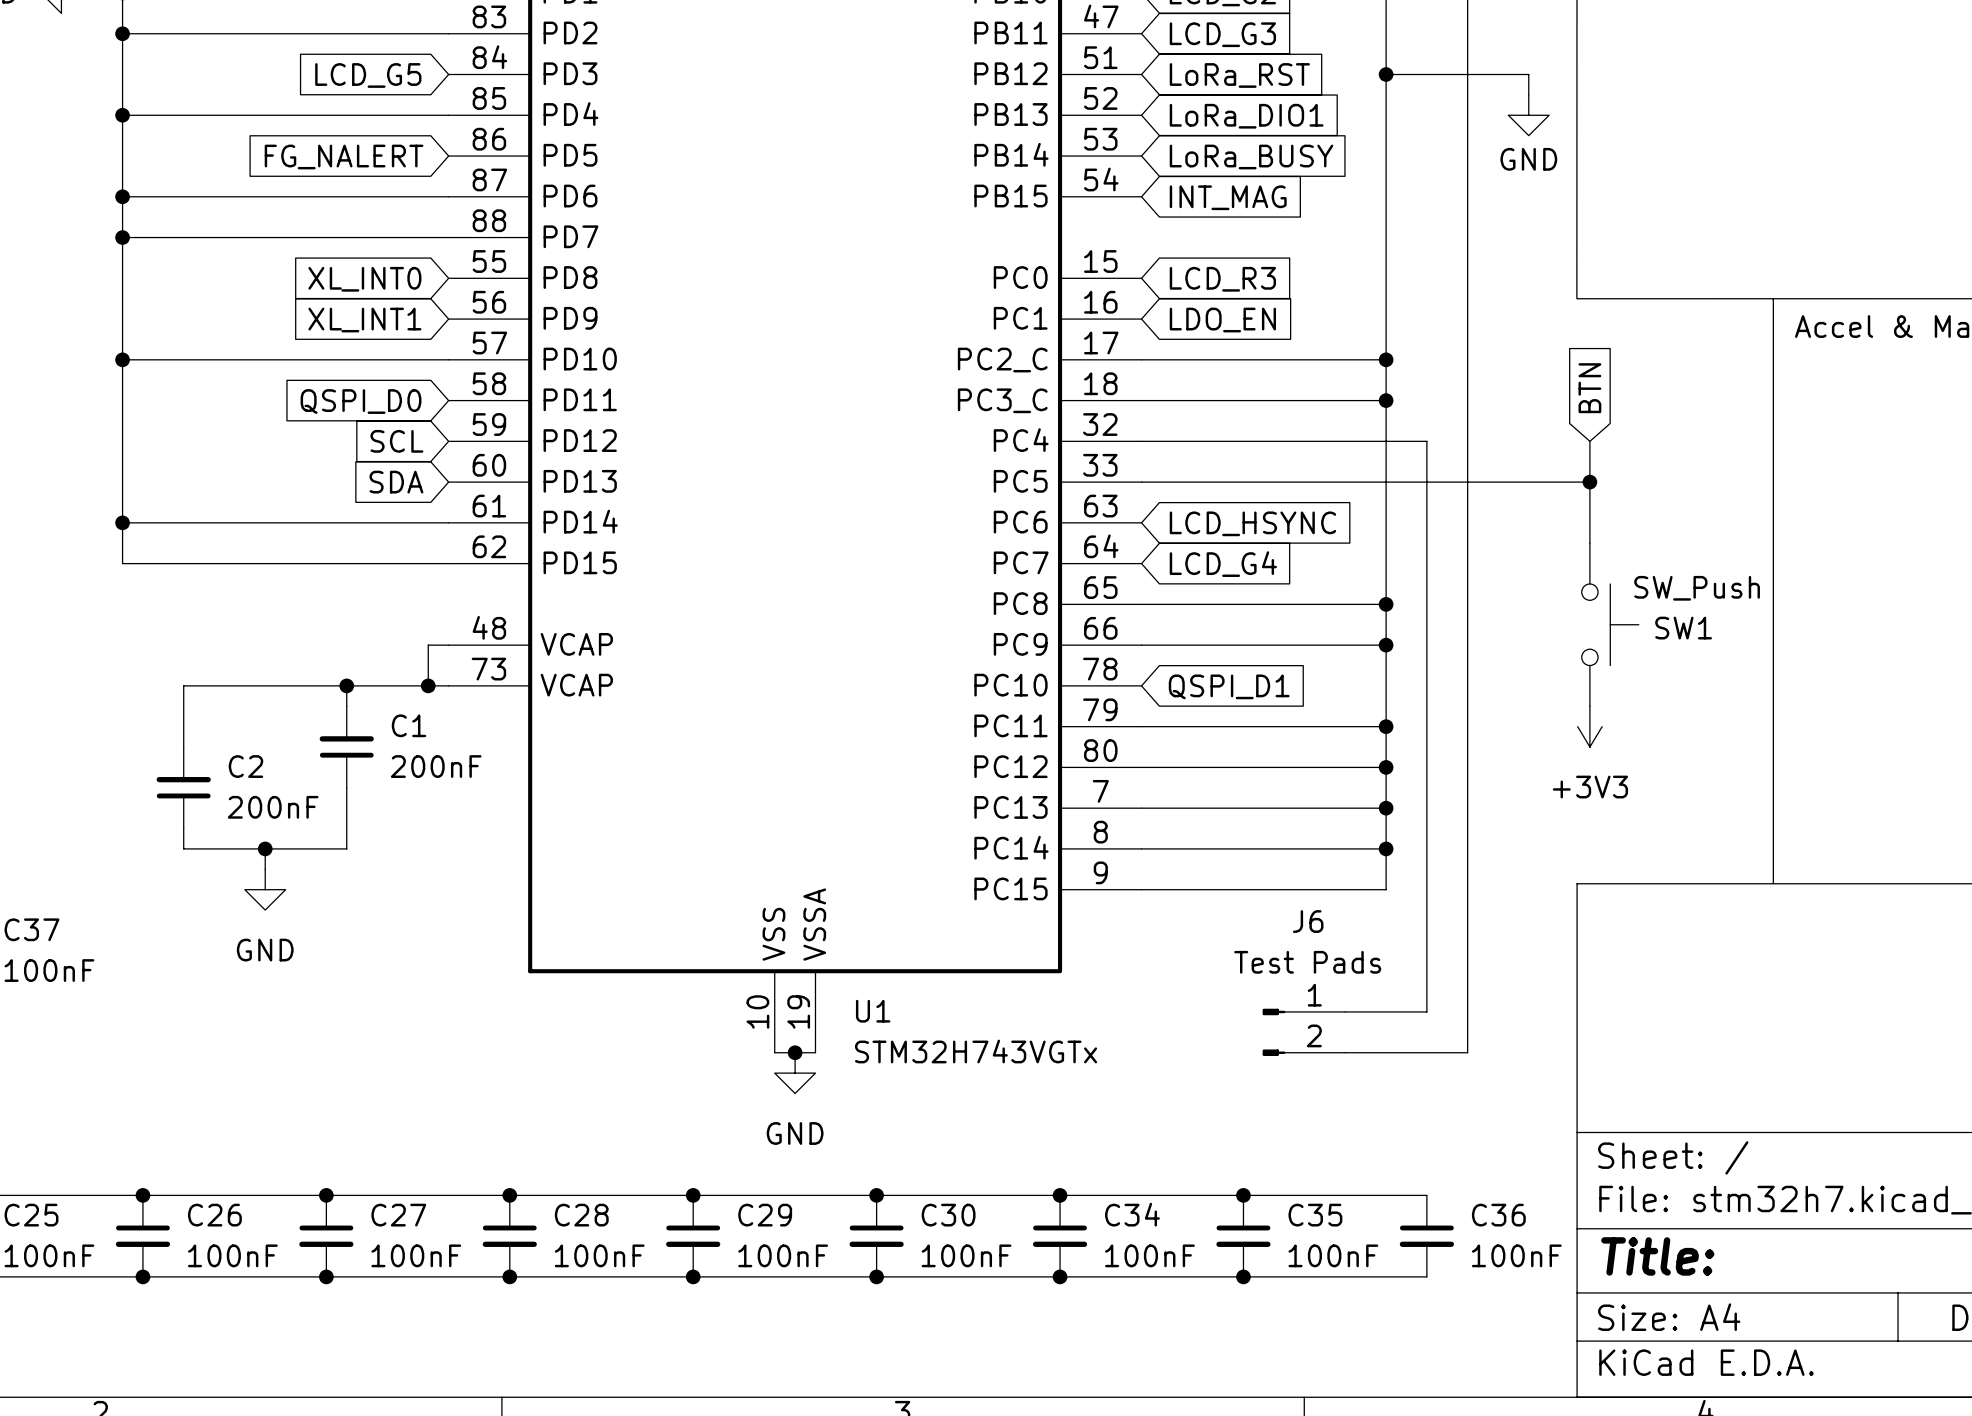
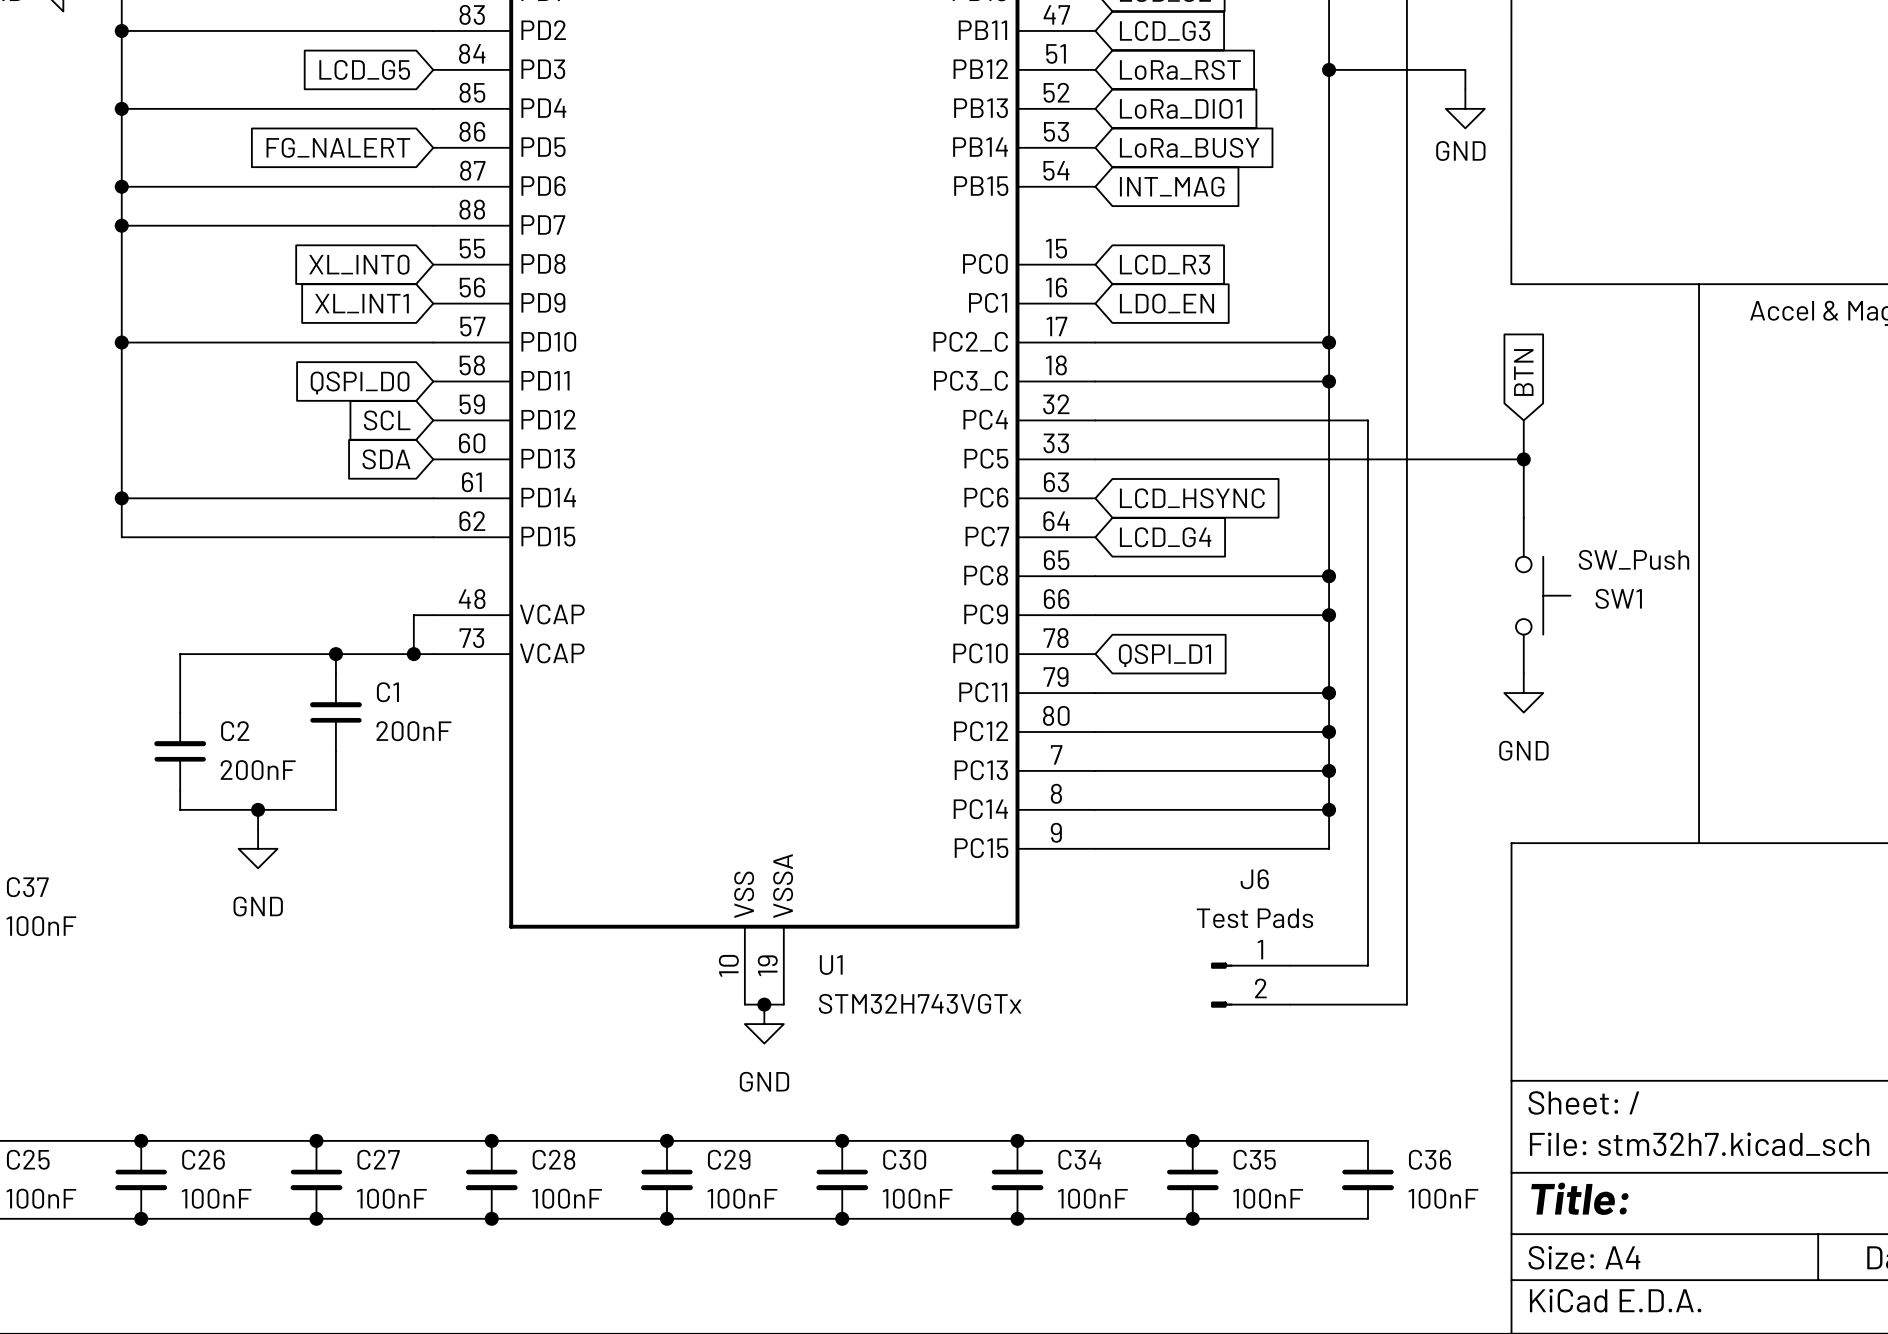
power symbol: +3V3 (1589, 726) -> GND (1523, 693)

